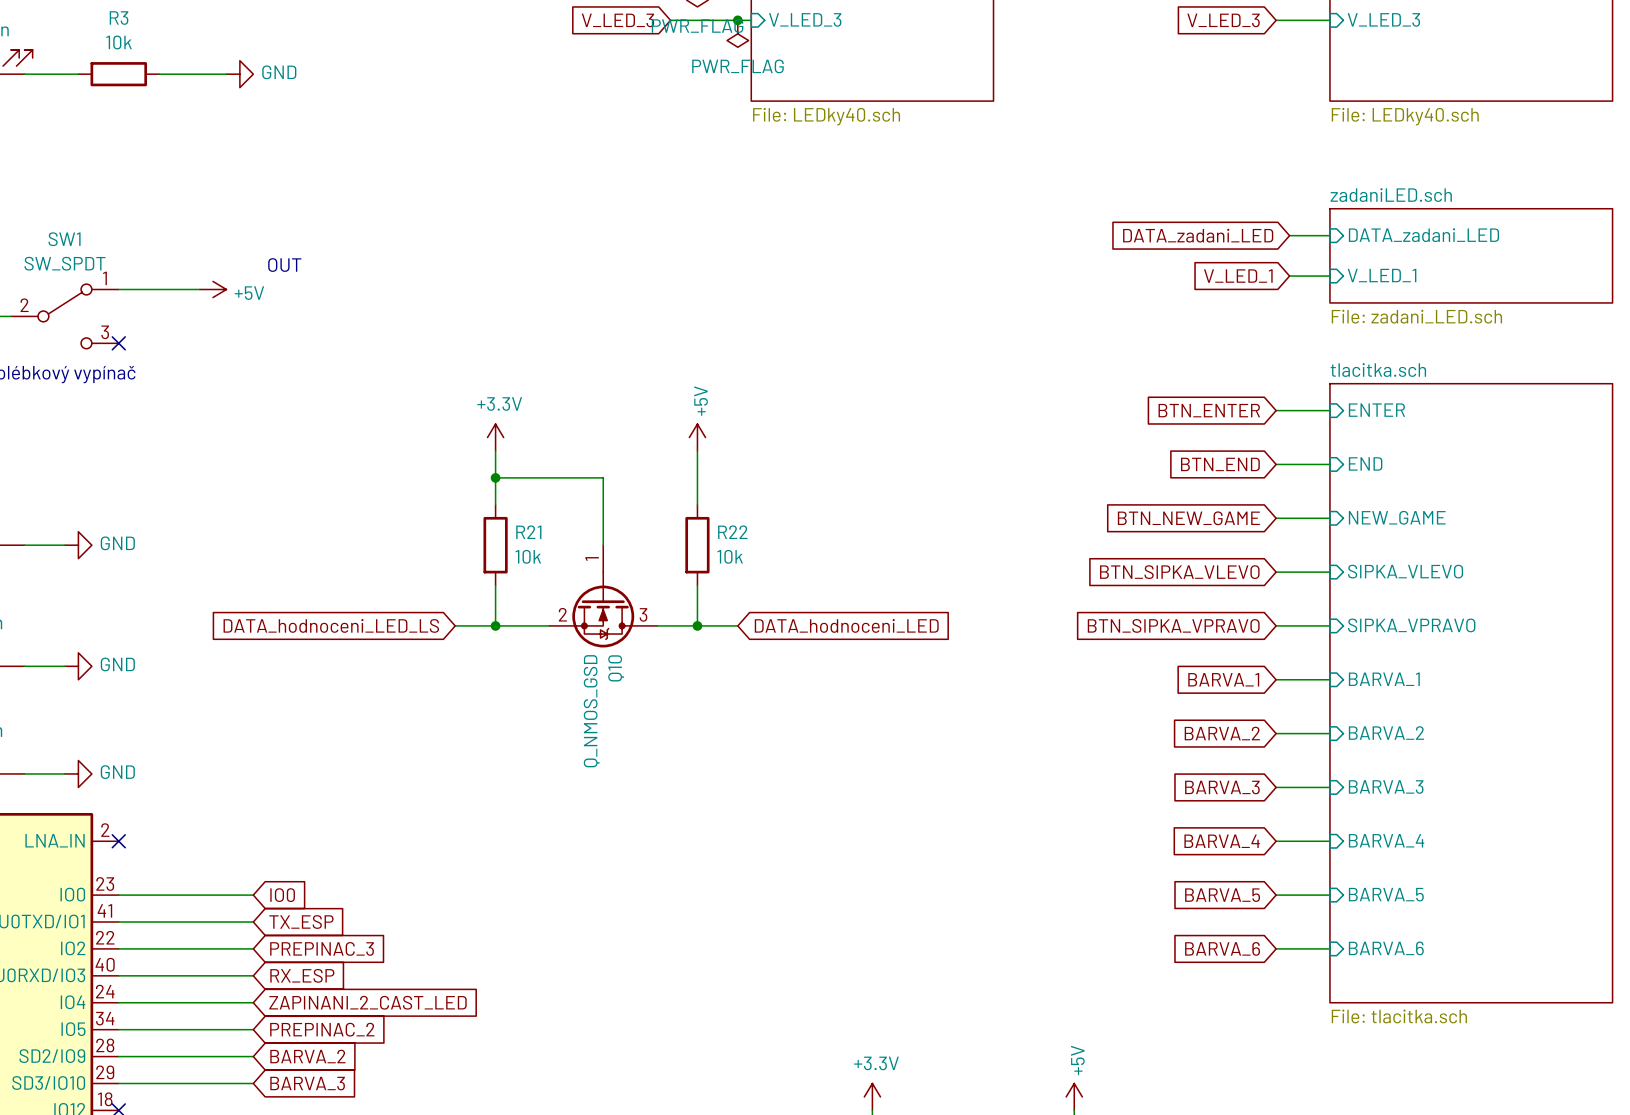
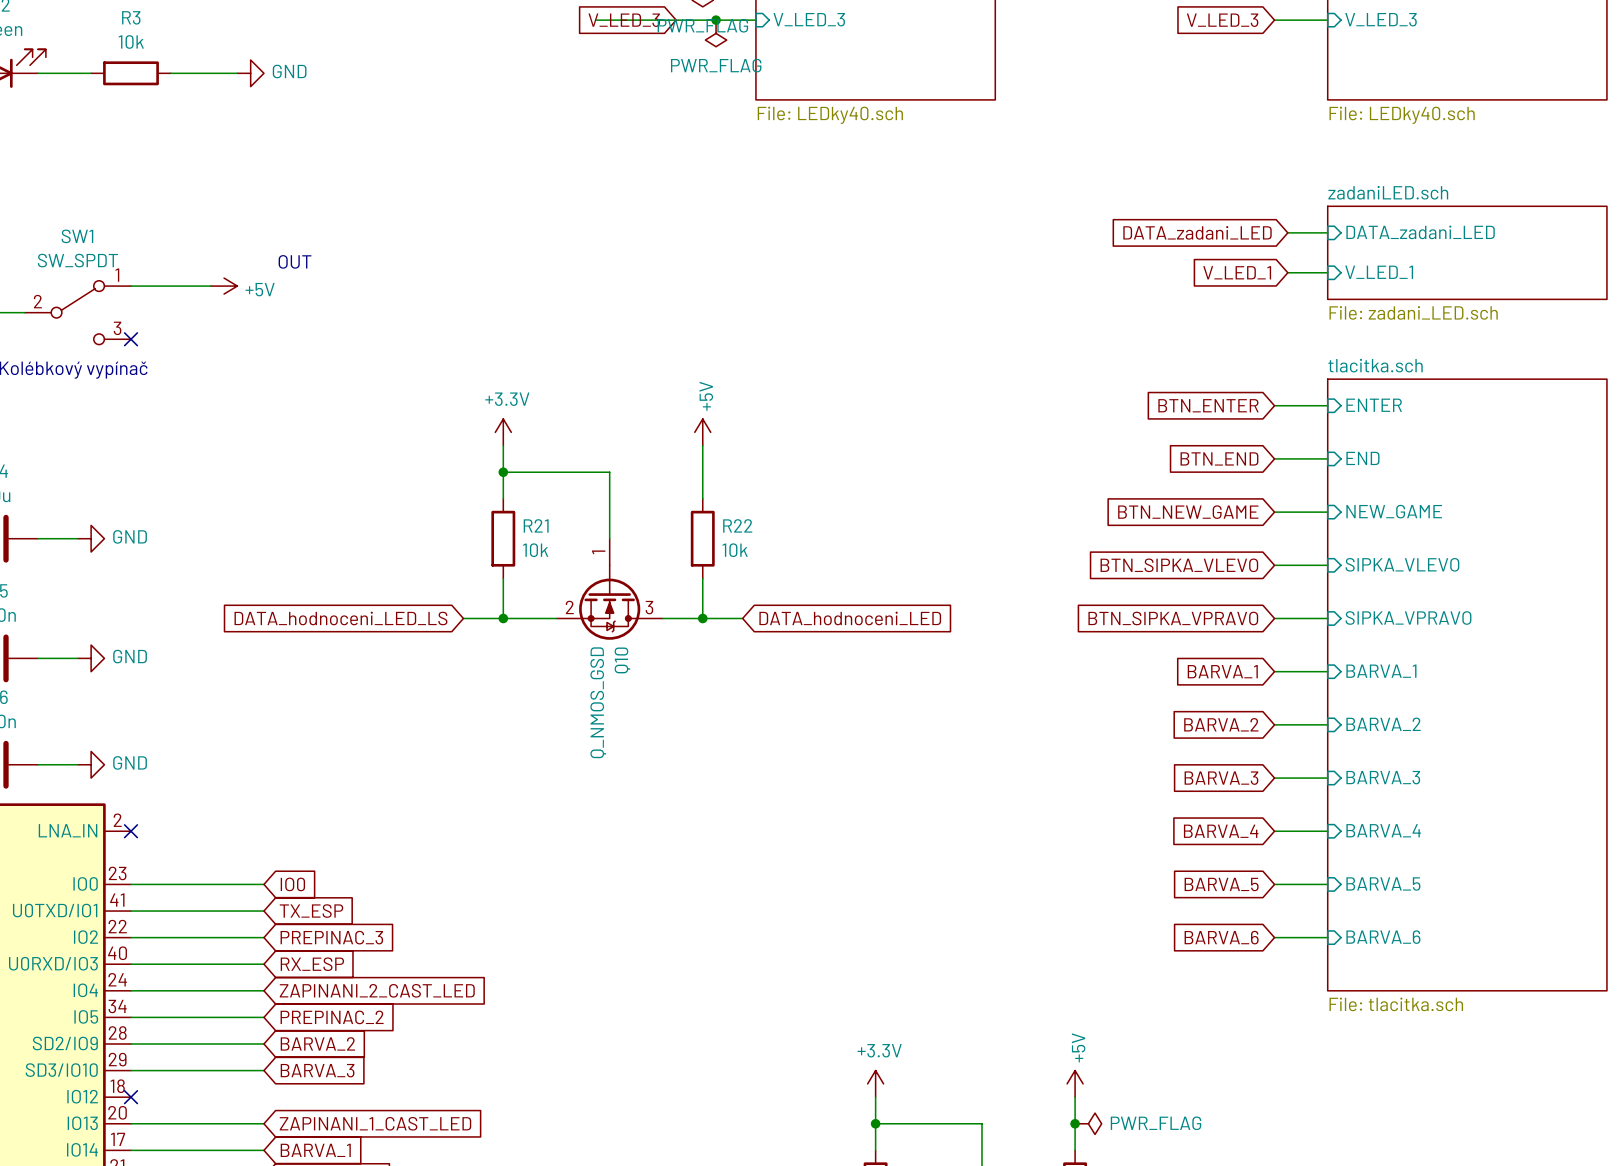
wire: none -> (596, 20) (676, 20)
junction: none -> (716, 20)
junction: (737, 20) -> none
power symbol position: PWR_FLAG (737, 33) -> PWR_FLAG (716, 33)

